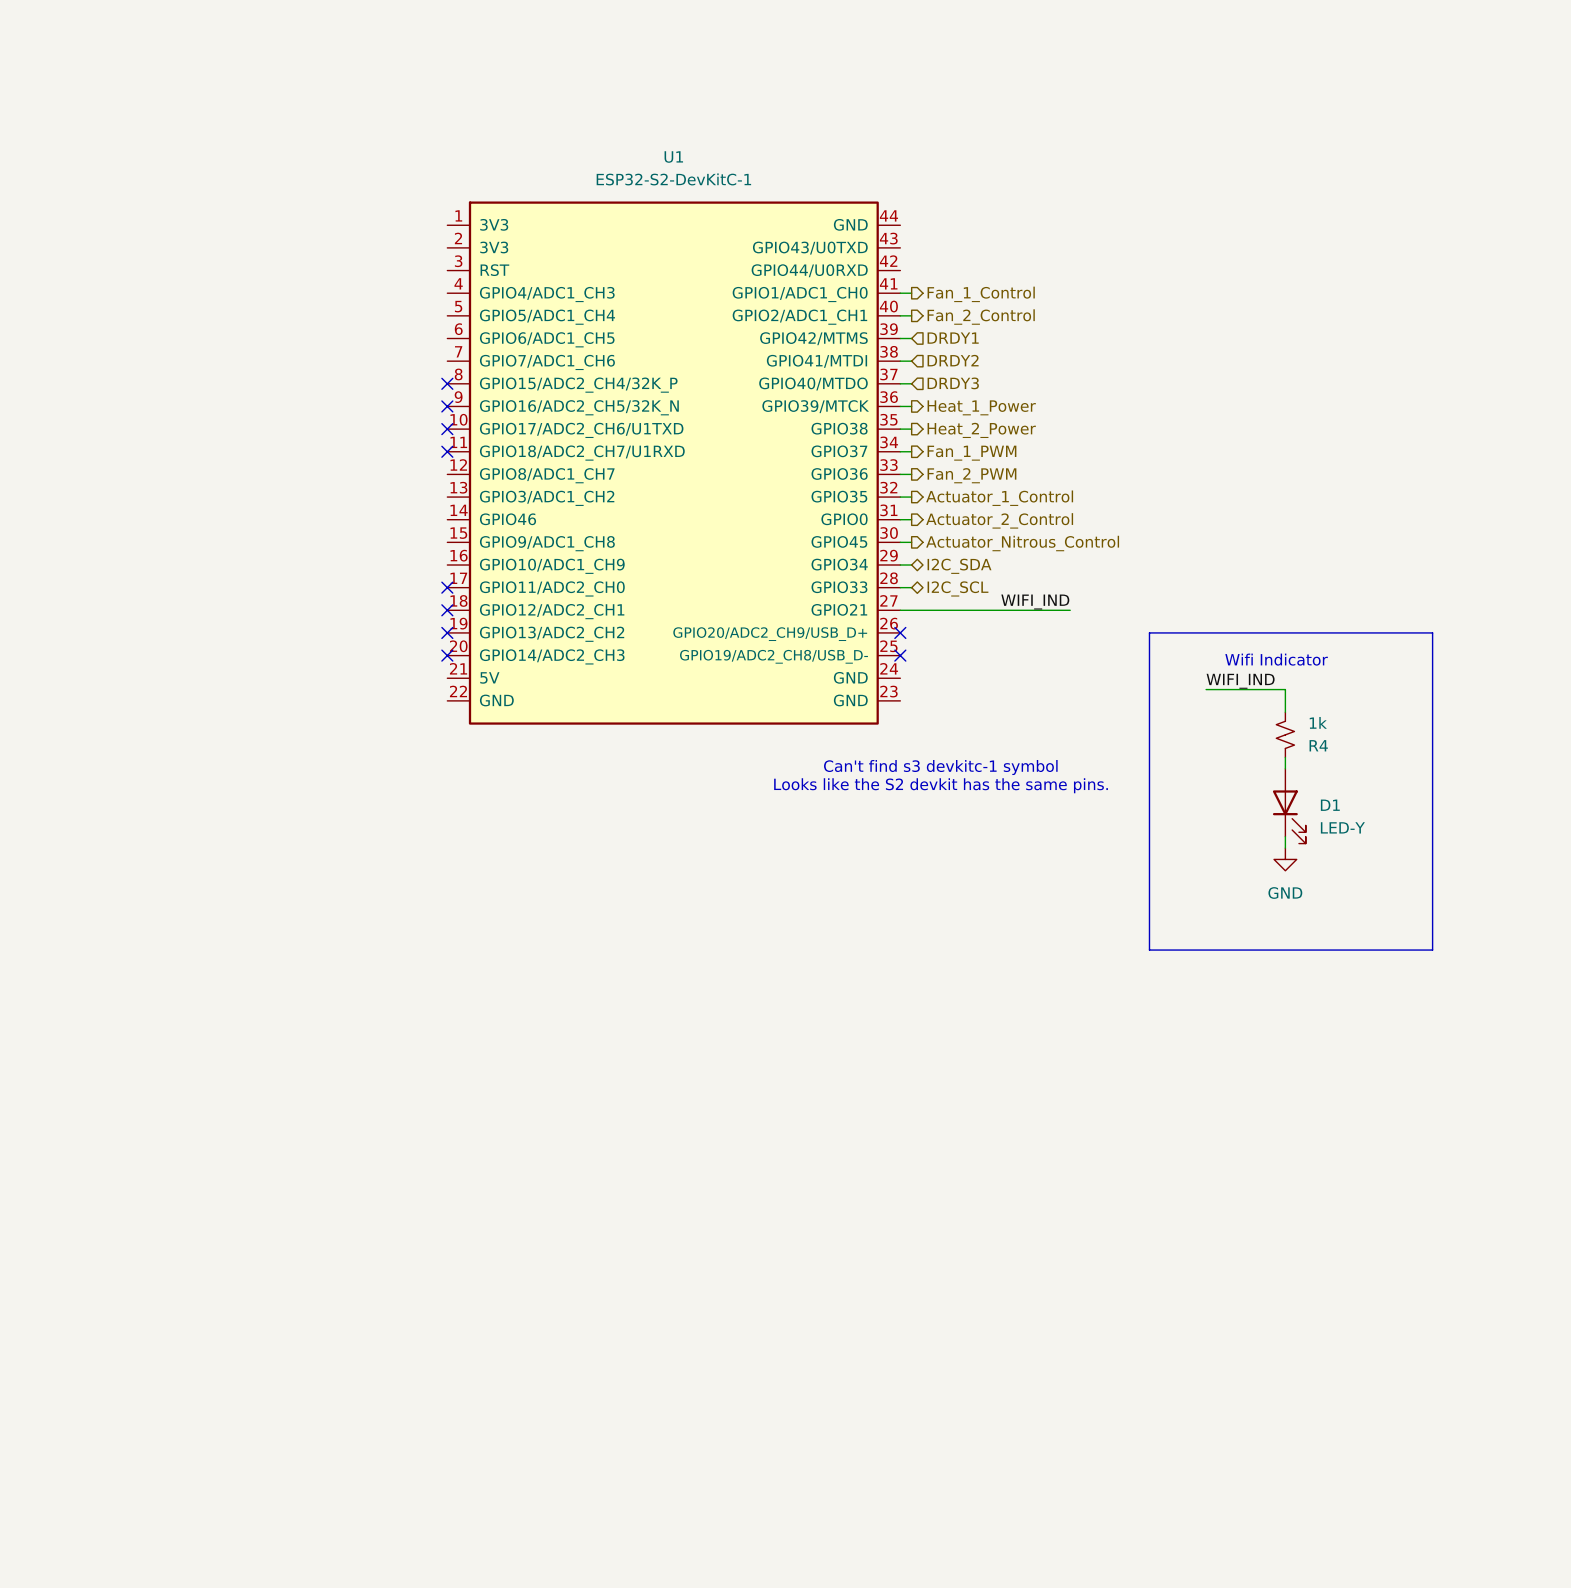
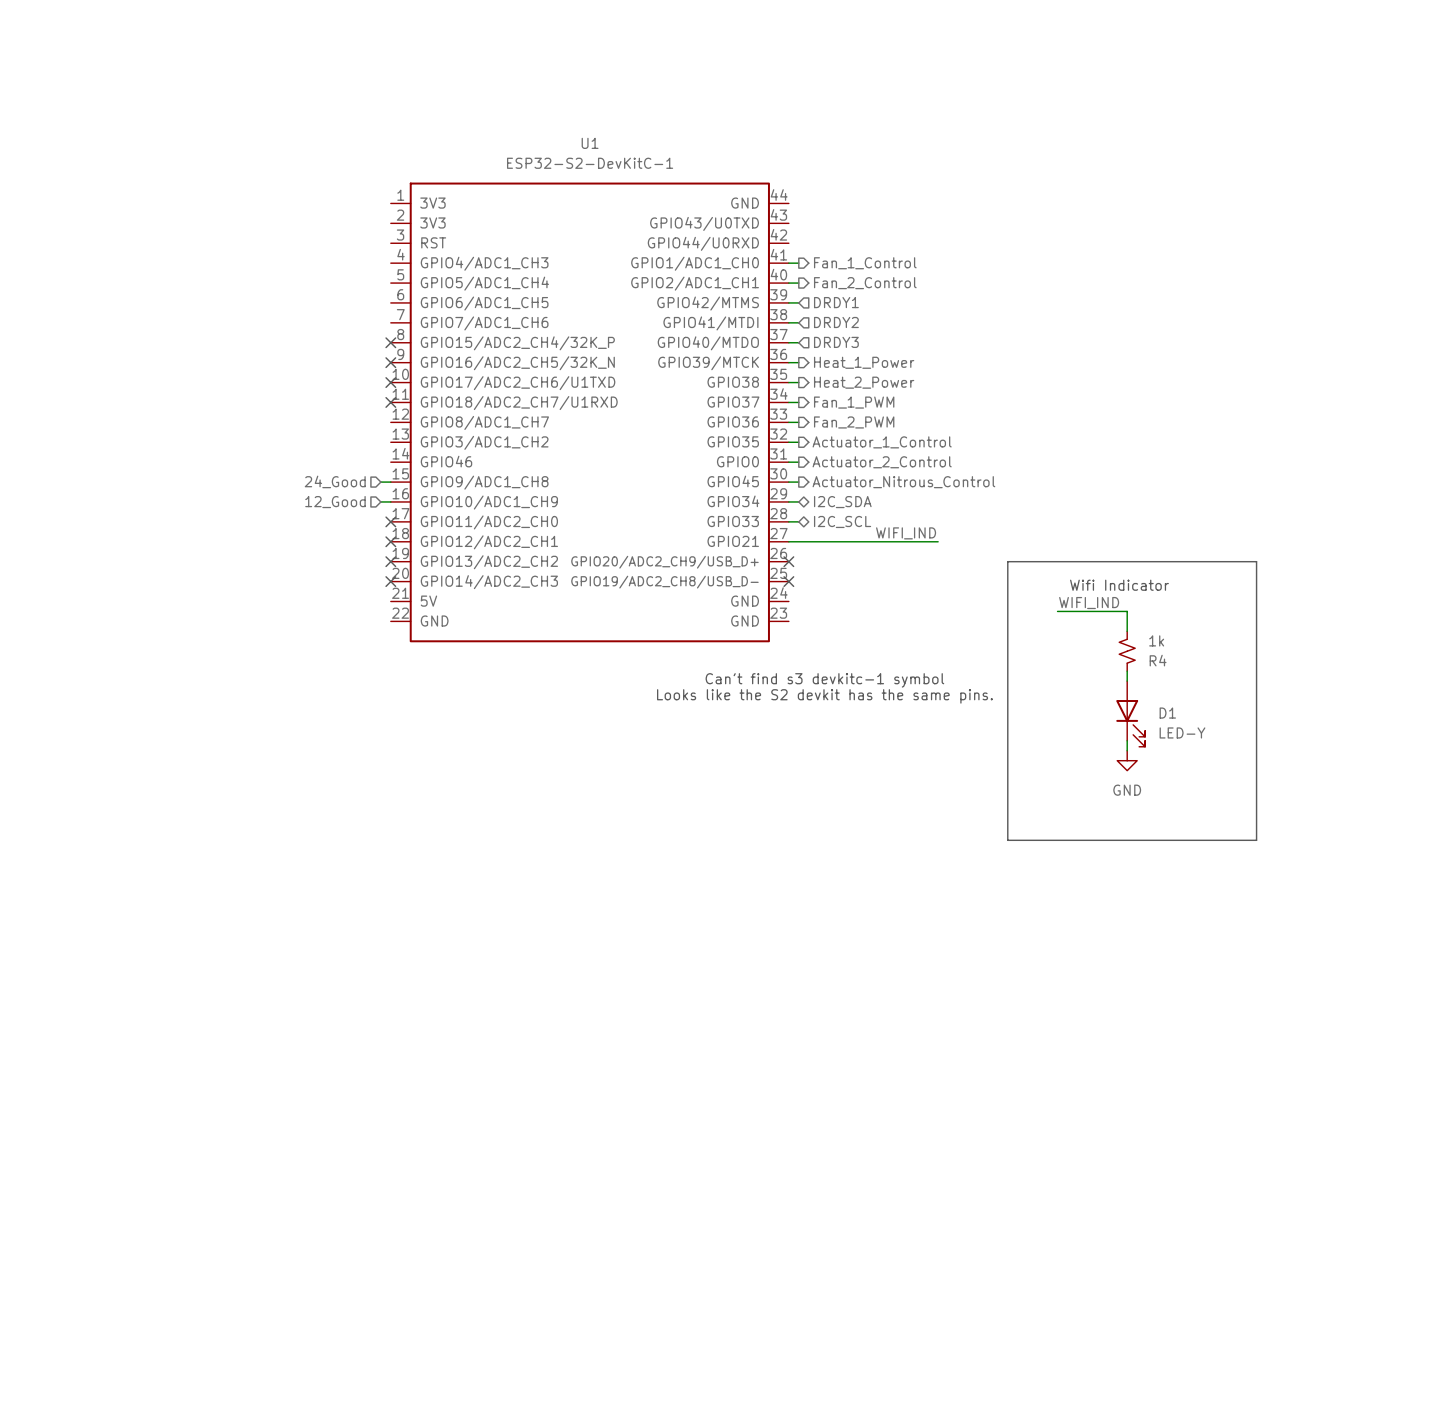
wire: none -> (380, 482) (390, 482)
hierarchical label: none -> 24_Good (335, 481)
wire: none -> (380, 501) (390, 501)
hierarchical label: none -> 12_Good (335, 502)

